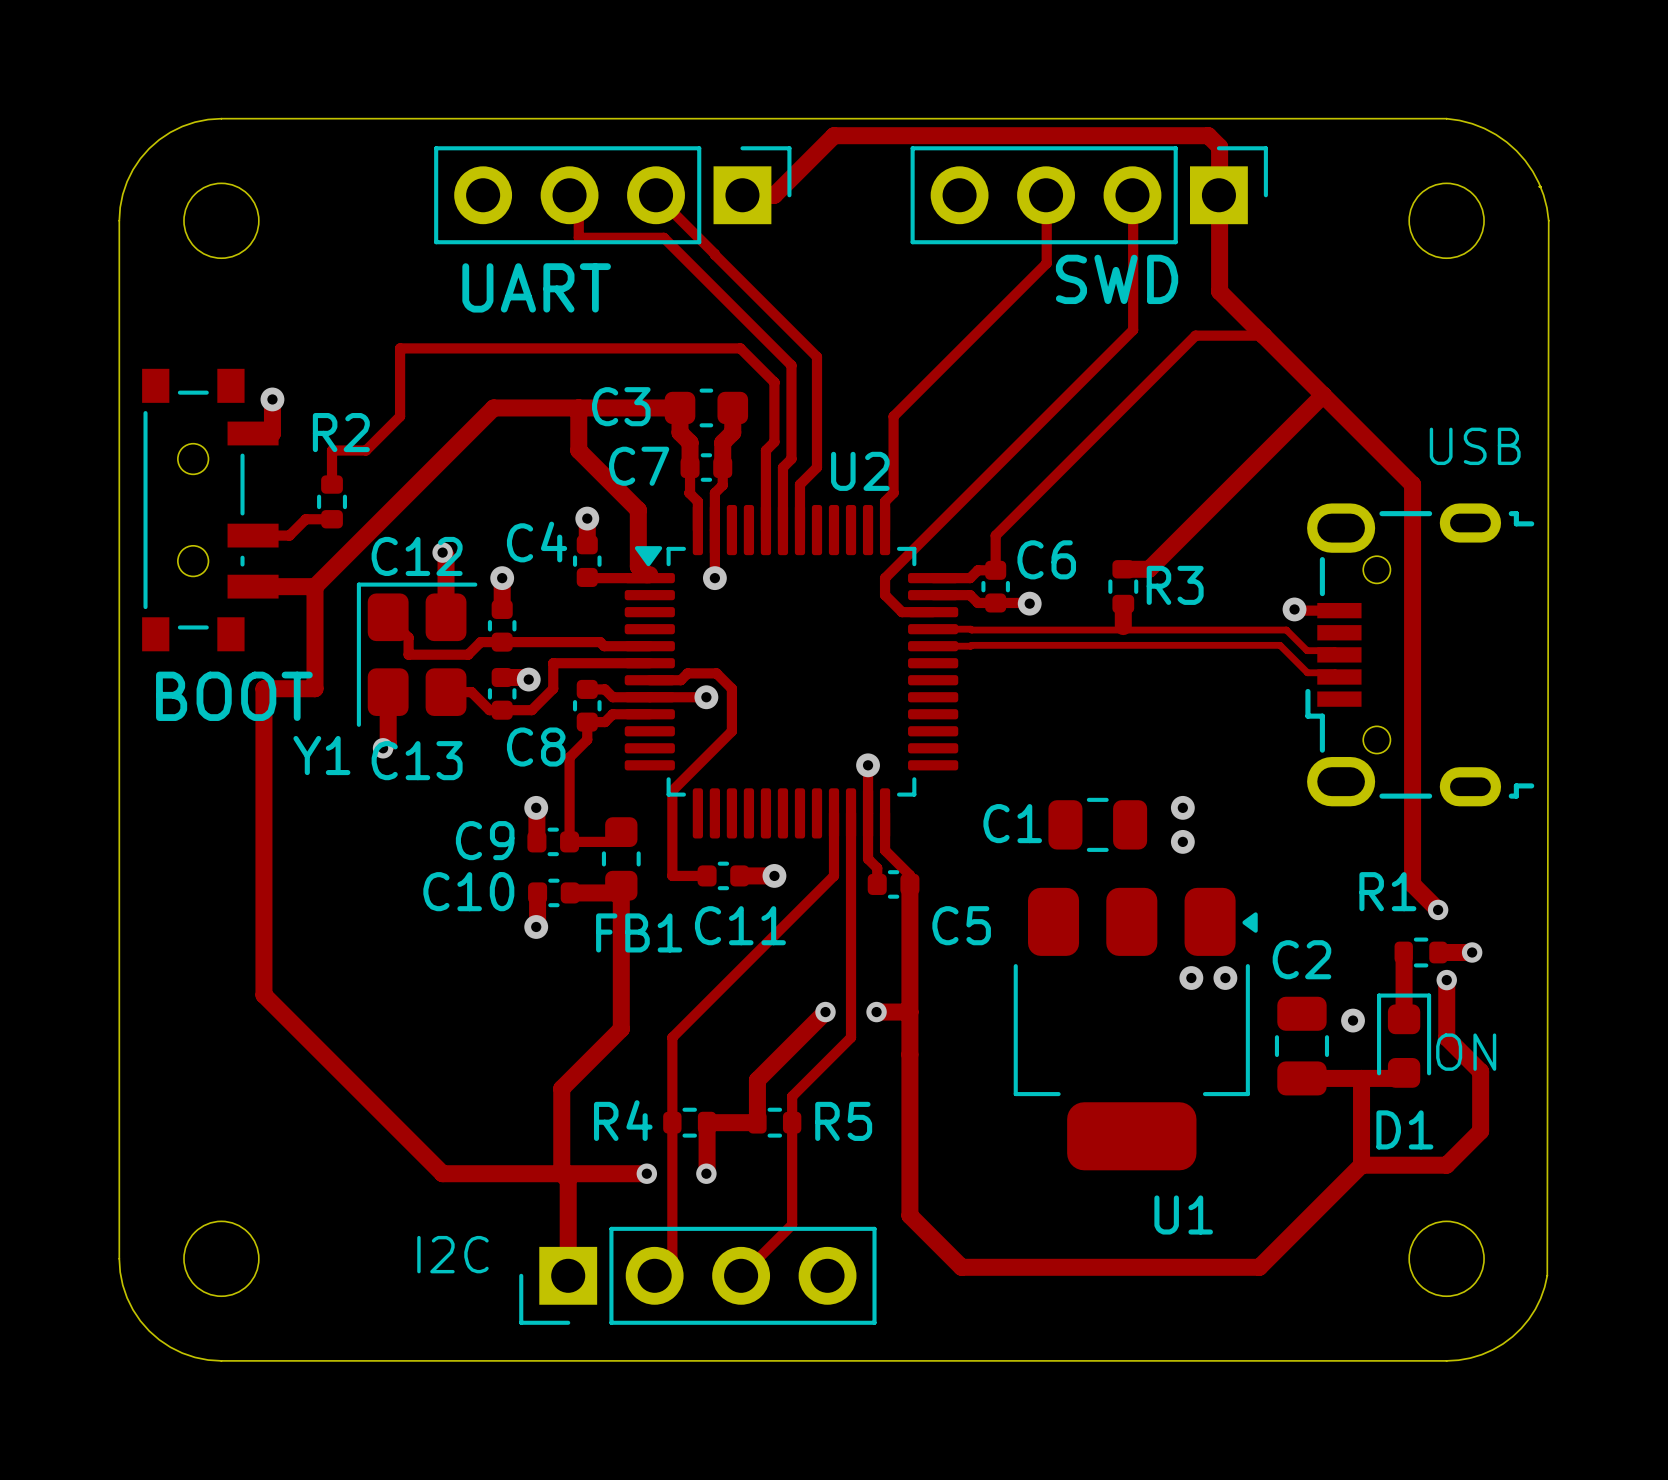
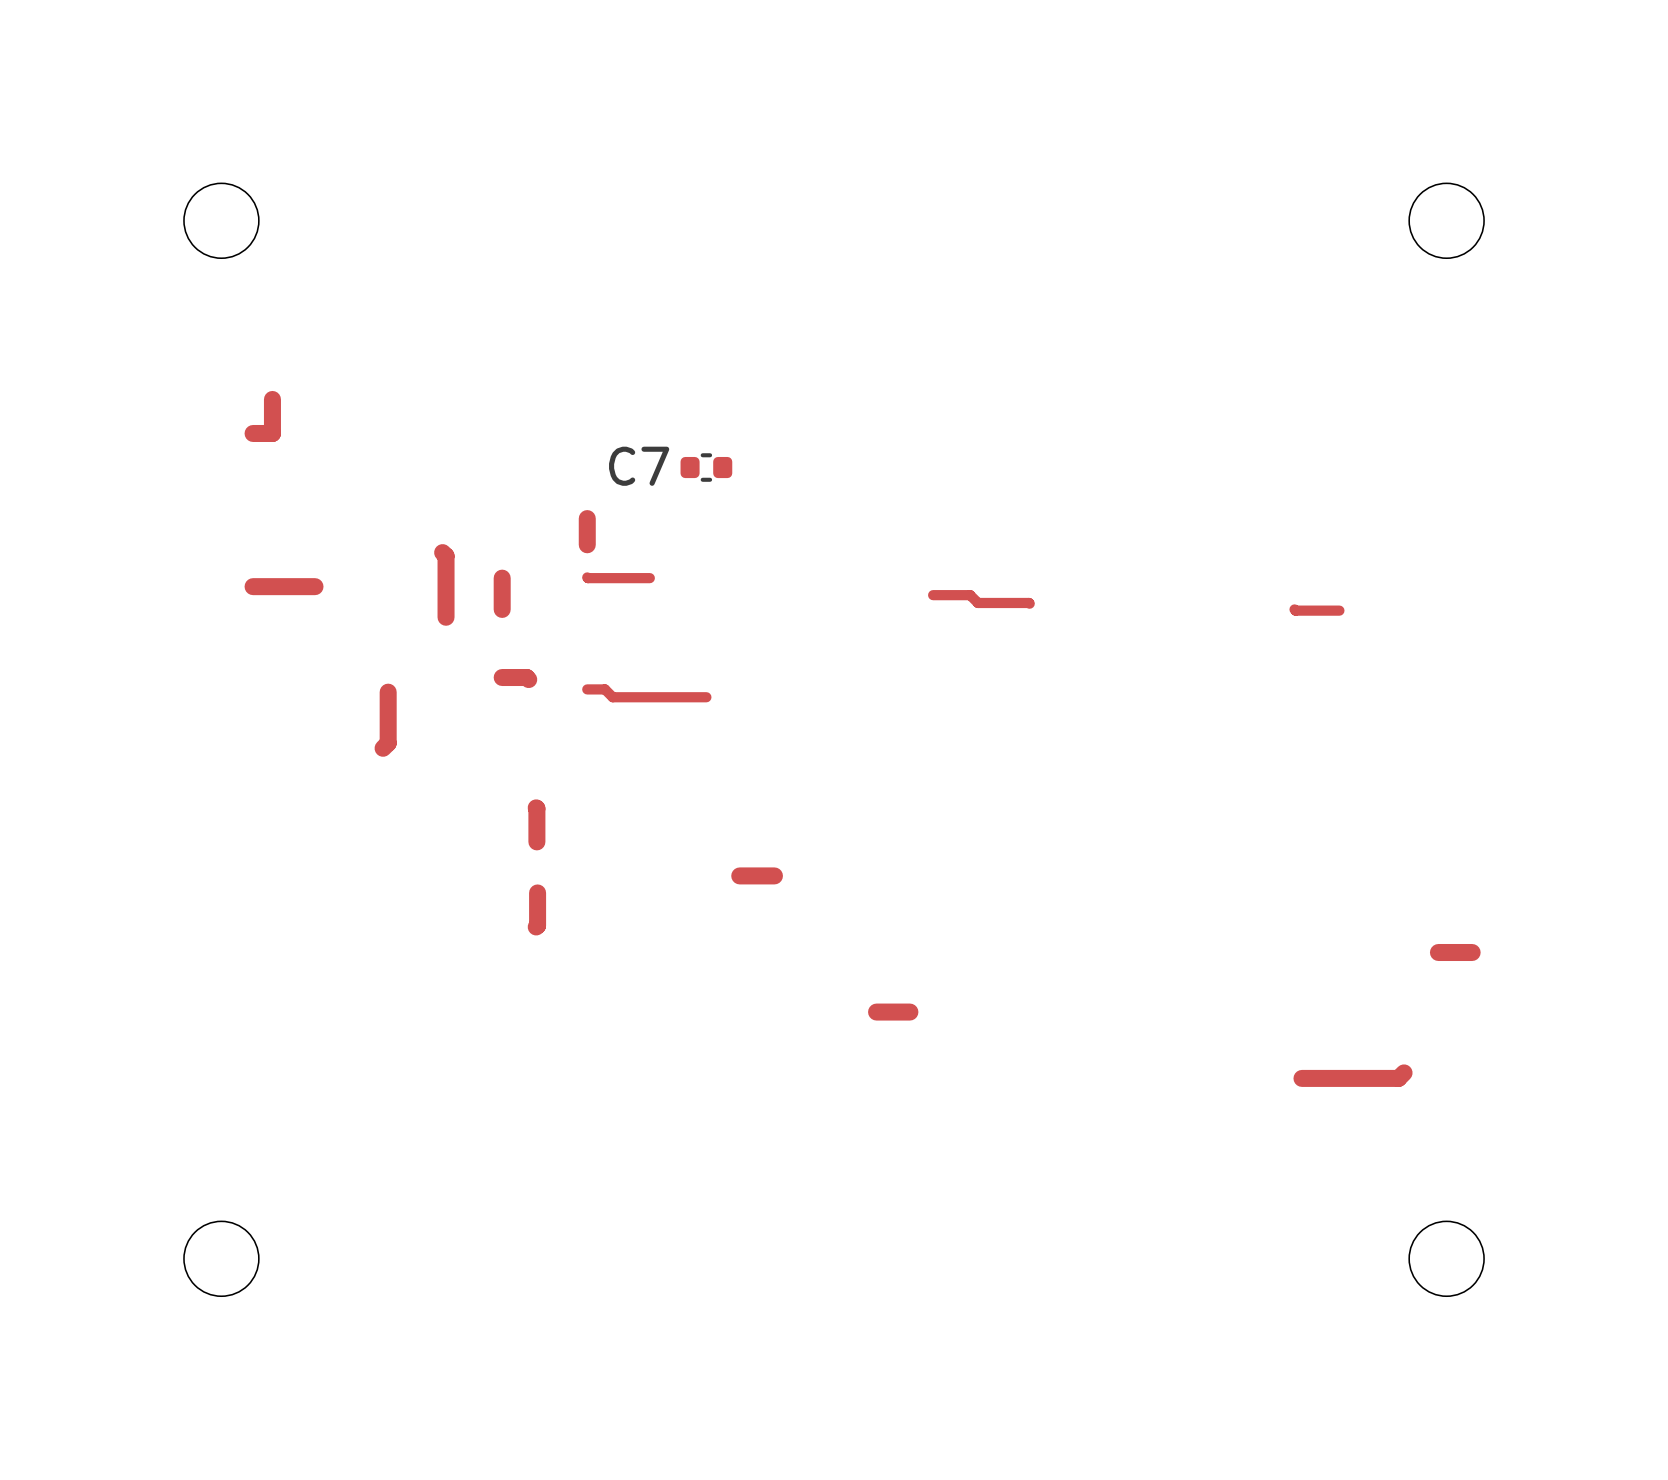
board edge: (1541, 186) (1539, 186) (1541, 186) -> none
track: (569, 195) (578, 204) (578, 237) (663, 237) (791, 365) (791, 459) (782, 467) (782, 530) -> none
part: (612, 195) -> none
track: (656, 195) (714, 254) -> none
track: (742, 195) (774, 195) (834, 135) (1208, 135) (1219, 146) (1219, 291) (1412, 484) (1412, 884) (1438, 909) -> none
track: (1046, 195) (1046, 263) (893, 416) (893, 493) (885, 501) (885, 530) -> none
part: (1089, 195) -> none
track: (1133, 195) (1133, 330) (885, 578) (885, 595) (902, 612) (933, 612) -> none
track: (714, 254) (816, 356) (816, 467) (799, 484) (799, 530) -> none
text: SWD (1117, 279) -> none
text: UART (536, 287) -> none
track: (1263, 335) (1195, 335) (995, 535) (995, 570) (977, 570) (970, 578) (933, 578) -> none
track: (1323, 395) (1149, 569) (1123, 569) -> none
via: (272, 399) -> none
track: (578, 407) (578, 450) (638, 510) (638, 566) (646, 574) (649, 574) -> none
C3: (706, 407) -> none
track: (732, 407) (732, 432) (722, 442) (722, 485) (714, 493) (714, 578) -> none
text: USB (1475, 446) -> none
track: (332, 484) (332, 450) (366, 450) (400, 416) (400, 348) (740, 348) (774, 382) (774, 442) (765, 450) (765, 530) -> none
R2: (332, 501) -> none
part: (210, 510) -> none
via: (587, 518) -> none
track: (332, 519) (305, 519) (289, 535) (253, 535) -> none
track: (697, 530) (697, 501) (689, 493) (690, 442) (680, 432) (680, 407) (493, 407) (315, 586) (315, 688) (263, 688) (263, 995) (442, 1173) (646, 1173) -> none
via: (442, 552) -> none
C4: (587, 561) -> none
via: (502, 578) -> none
via: (714, 578) -> none
C6: (995, 586) -> none
R3: (1123, 586) -> none
via: (1029, 603) -> none
track: (1123, 604) (1123, 626) -> none
via: (1294, 609) -> none
track: (388, 617) (408, 637) (408, 654) (468, 654) (480, 642) (600, 642) (604, 646) (649, 646) -> none
C12: (502, 625) -> none
track: (933, 629) (1286, 630) (1307, 650) (1334, 650) (1338, 654) -> none
track: (933, 646) (1280, 645) (1307, 672) (1335, 672) (1339, 677) -> none
Y1: (417, 654) -> none
part: (1419, 654) -> none
track: (649, 663) (553, 663) (553, 688) (531, 710) (489, 710) (471, 692) (446, 692) -> none
U2: (791, 671) -> none
via: (528, 679) -> none
track: (649, 680) (680, 680) (687, 673) (716, 673) (731, 688) (731, 731) (672, 790) (672, 875) (707, 875) -> none
C13: (502, 693) -> none
text: BOOT (234, 696) -> none
via: (706, 697) -> none
C8: (587, 705) -> none
track: (649, 714) (612, 714) (604, 722) (587, 722) (587, 739) (569, 757) (569, 841) (611, 841) (621, 832) -> none
via: (383, 748) -> none
track: (868, 765) (868, 858) (877, 868) (877, 884) -> none
via: (868, 765) -> none
via: (536, 807) -> none
via: (1182, 807) -> none
track: (834, 813) (834, 875) (672, 1037) (672, 1258) (654, 1275) -> none
track: (851, 813) (851, 1037) (792, 1096) (792, 1224) (741, 1275) -> none
track: (885, 813) (885, 850) (909, 875) (909, 1215) (961, 1267) (1259, 1267) (1361, 1165) -> none
C1: (1097, 824) -> none
C9: (553, 841) -> none
via: (1182, 841) -> none
FB1: (621, 858) -> none
C11: (723, 875) -> none
via: (774, 875) -> none
C5: (893, 884) -> none
C10: (553, 892) -> none
track: (570, 892) (614, 892) (621, 885) (621, 1029) (561, 1088) (561, 1173) (568, 1180) (568, 1275) -> none
via: (1438, 909) -> none
via: (536, 926) -> none
R1: (1421, 952) -> none
via: (1472, 952) -> none
track: (1404, 961) (1404, 1019) -> none
via: (1191, 978) -> none
via: (1225, 978) -> none
track: (1446, 980) (1446, 1037) (1480, 1071) (1480, 1131) (1446, 1165) (1361, 1165) -> none
via: (1446, 980) -> none
track: (825, 1012) (757, 1080) (757, 1122) (707, 1122) (706, 1173) -> none
via: (825, 1012) -> none
via: (876, 1012) -> none
via: (1353, 1020) -> none
U1: (1135, 1029) -> none
D1: (1404, 1040) -> none
C2: (1301, 1046) -> none
text: ON (1466, 1052) -> none
track: (1361, 1078) (1361, 1165) -> none
R4: (689, 1122) -> none
R5: (774, 1122) -> none
via: (646, 1173) -> none
via: (706, 1173) -> none
text: I2C (452, 1254) -> none
part: (697, 1275) -> none
board edge: (1547, 1275) (1544, 1287) (1540, 1298) (1535, 1309) (1512, 1336) (1481, 1354) (1446, 1360) (221, 1360) (208, 1360) (182, 1353) (159, 1339) (149, 1330) (132, 1309) (122, 1285) (119, 1258) (119, 220) (120, 207) (127, 181) (140, 158) (159, 139) (182, 126) (208, 119) (221, 118) (1446, 118) (1459, 120) (1484, 128) (1506, 142) (1525, 160) (1532, 171) (1543, 195) (1548, 220) (1547, 1275) -> none

